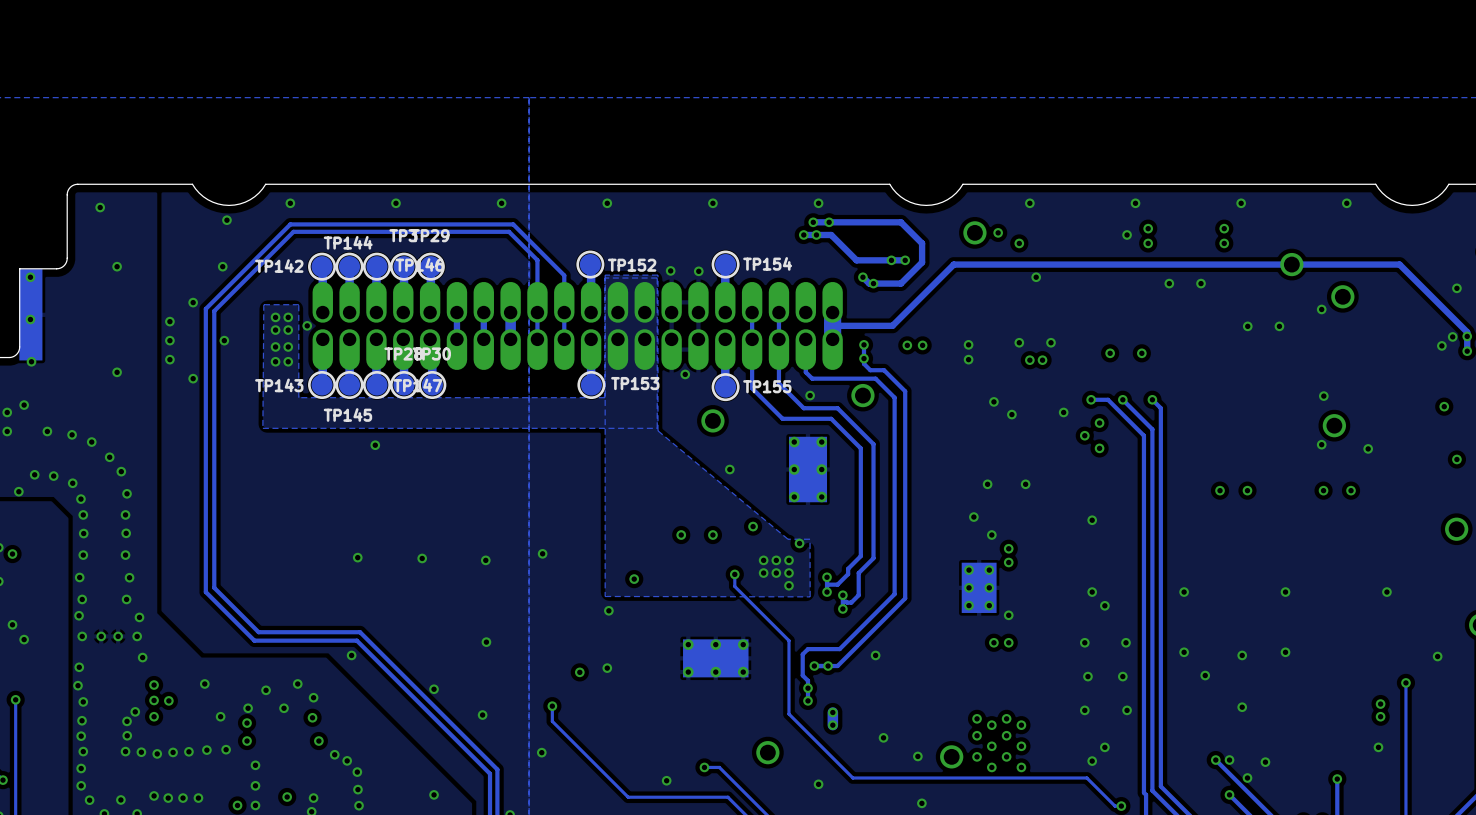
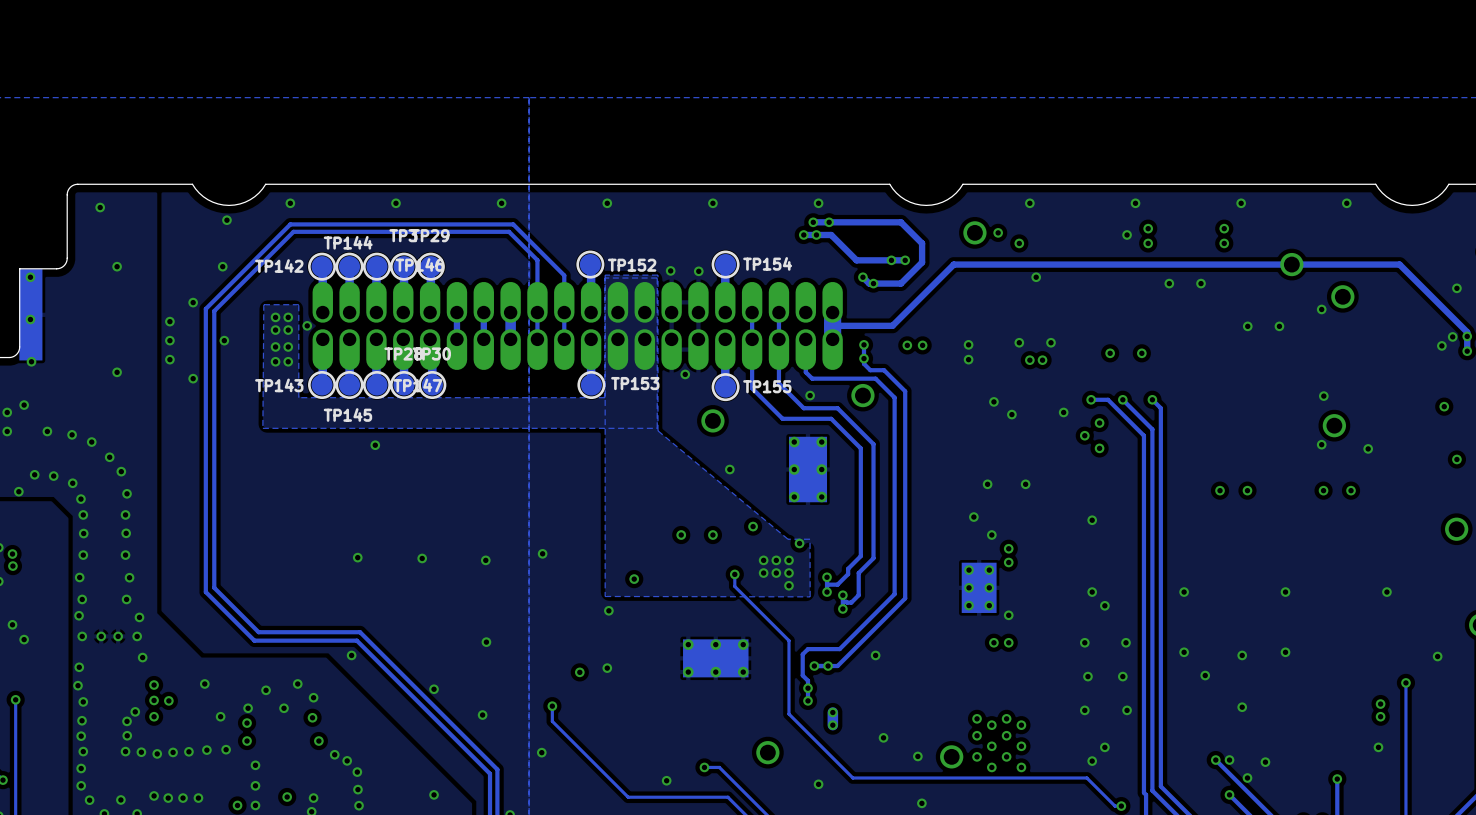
via: none -> (12, 566)

